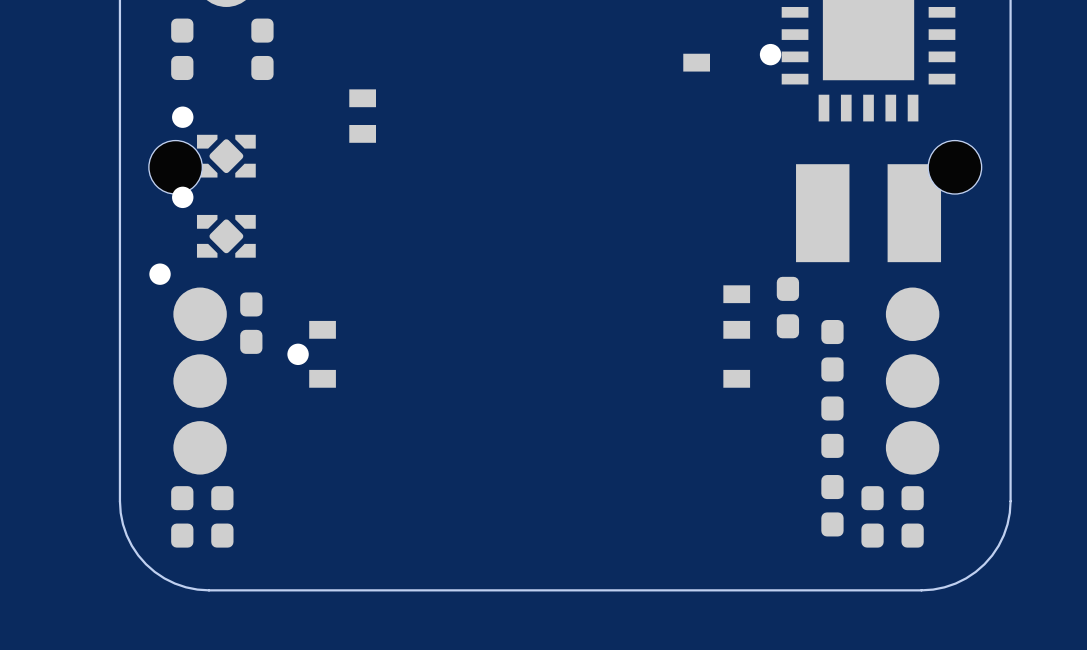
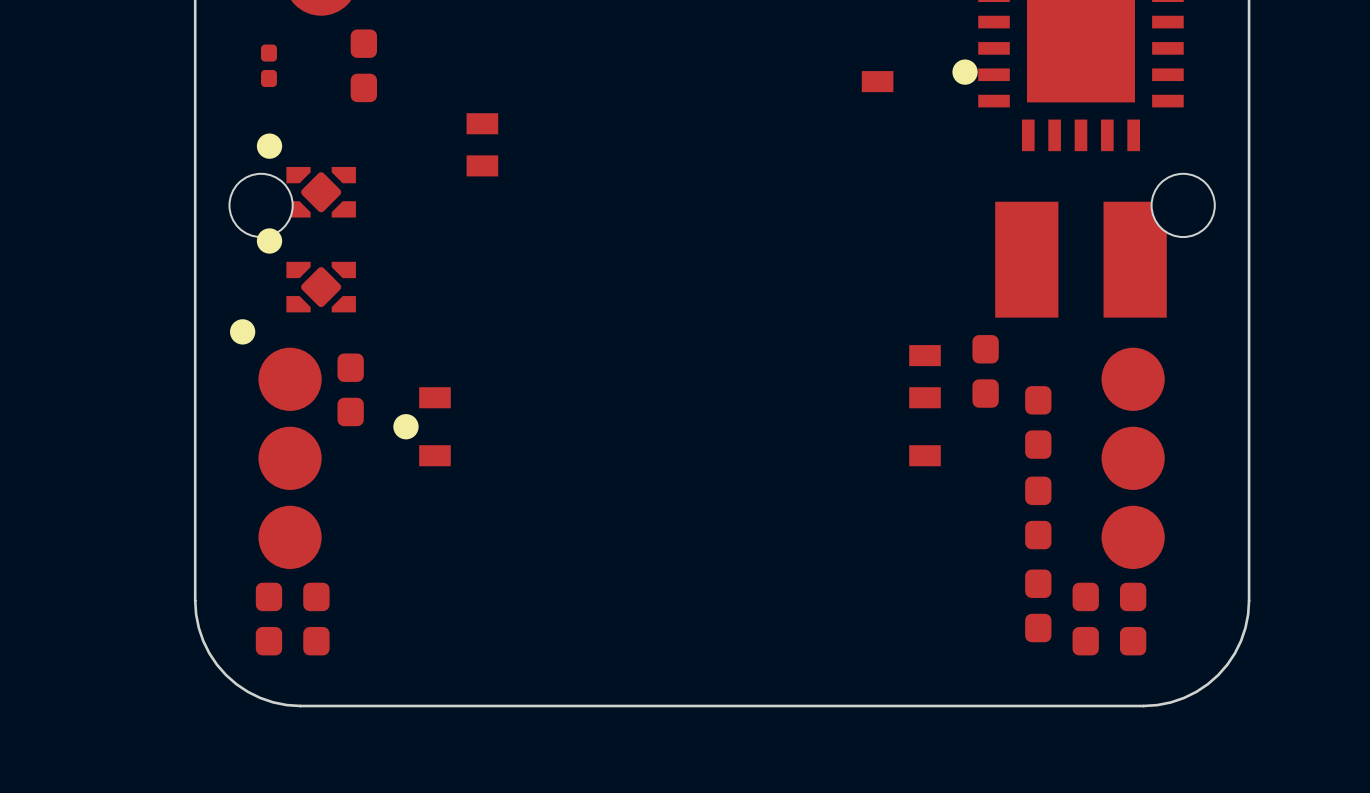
part footprint: [171, 18, 194, 81] -> [261, 44, 277, 88]

